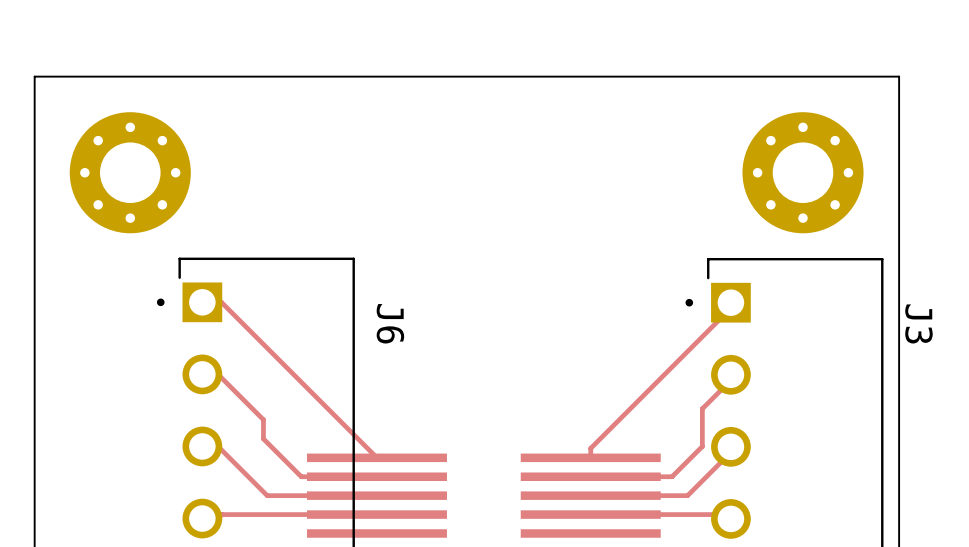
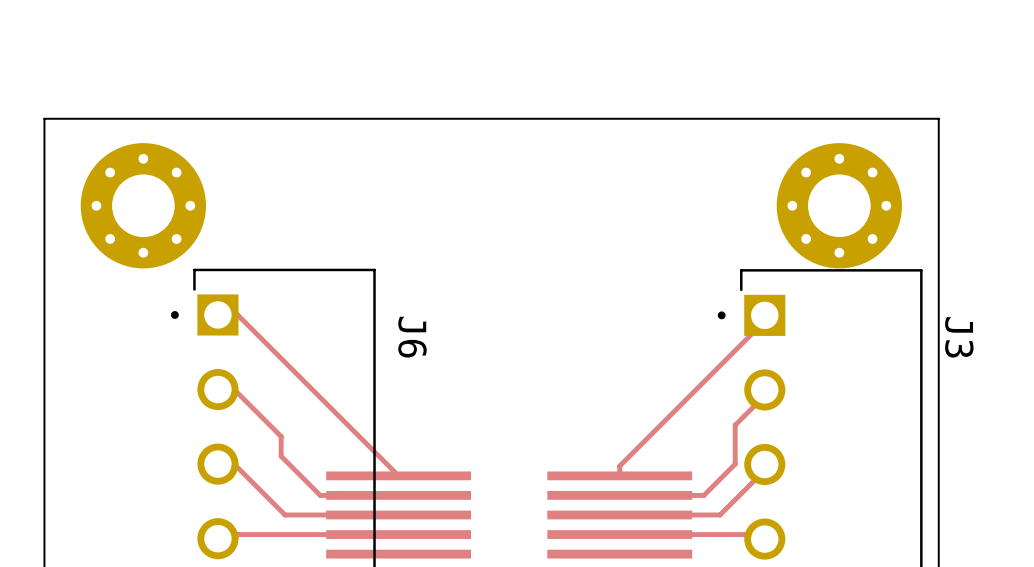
board edge: (899, 112) (899, 76) (34, 76) (34, 112) -> (938, 118) (44, 118)
part position: (130, 172) -> (143, 205)
part position: (803, 172) -> (839, 205)

